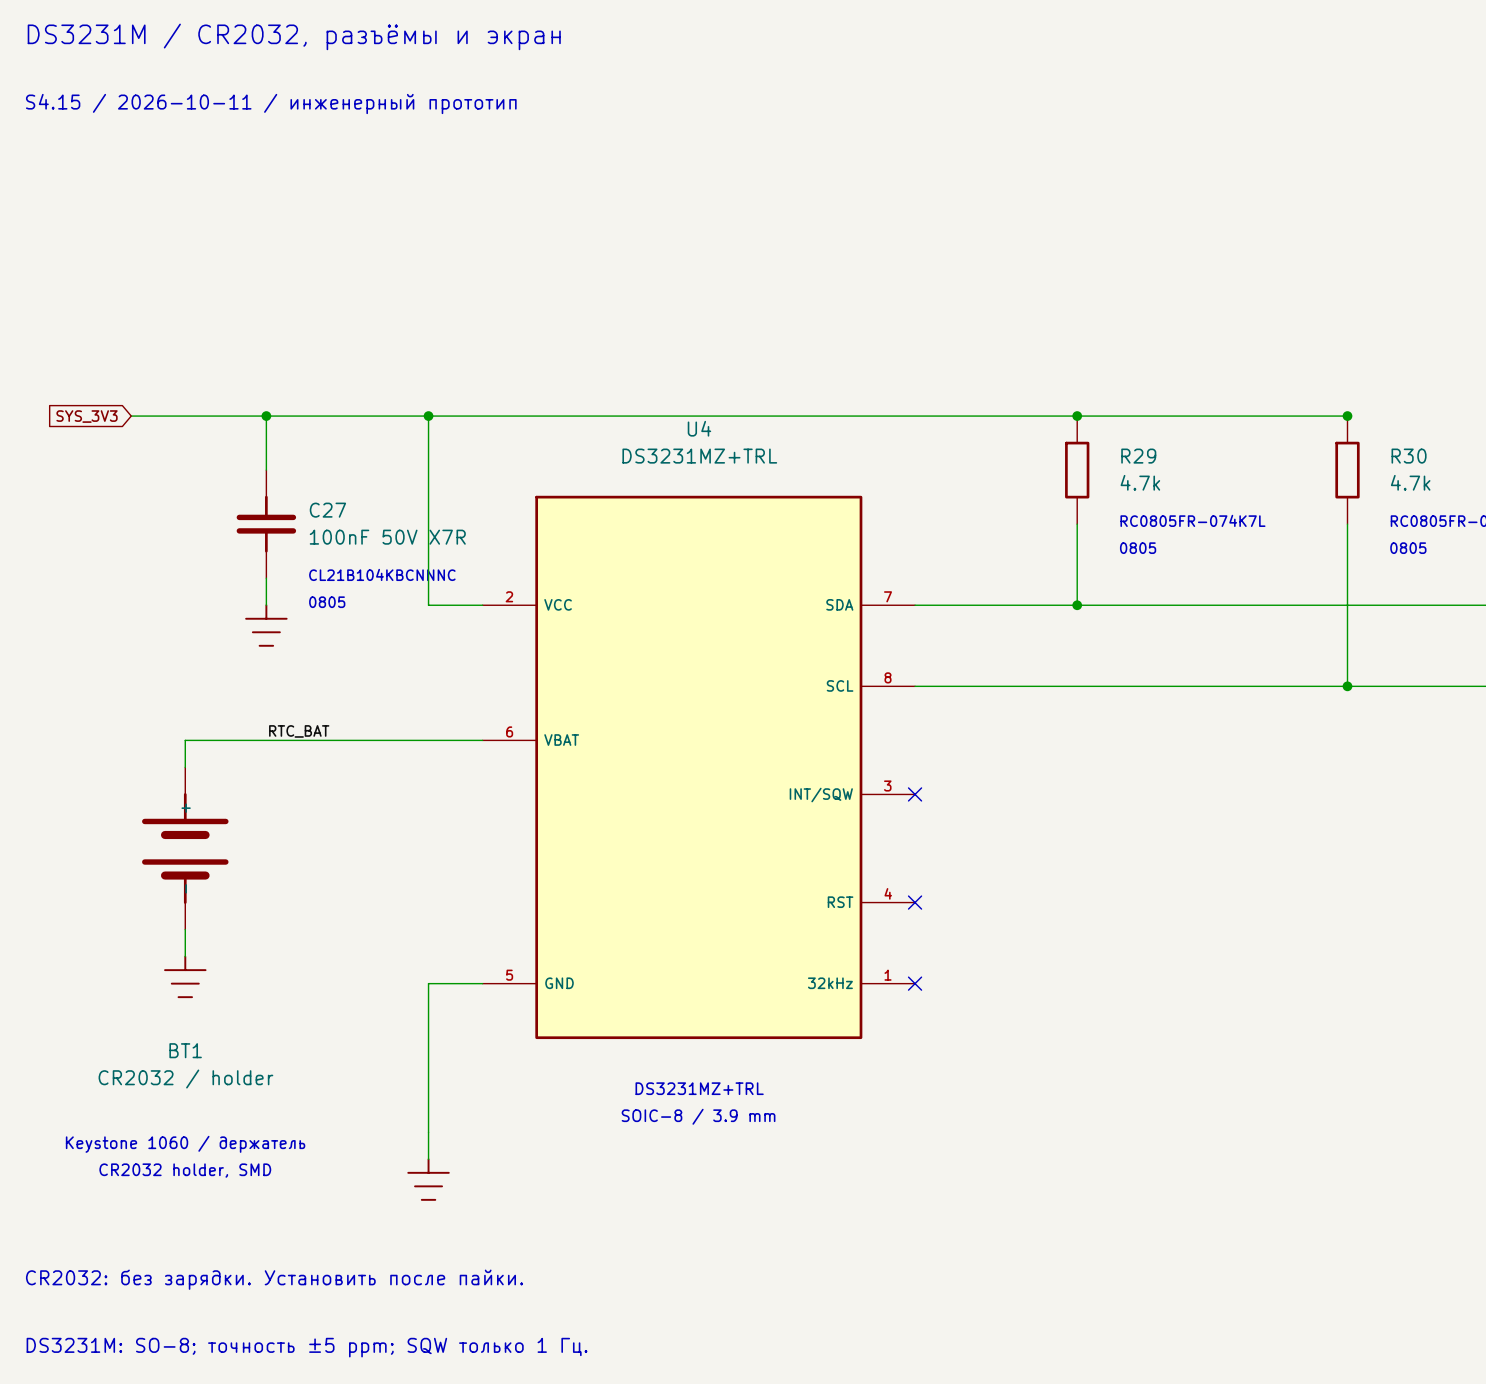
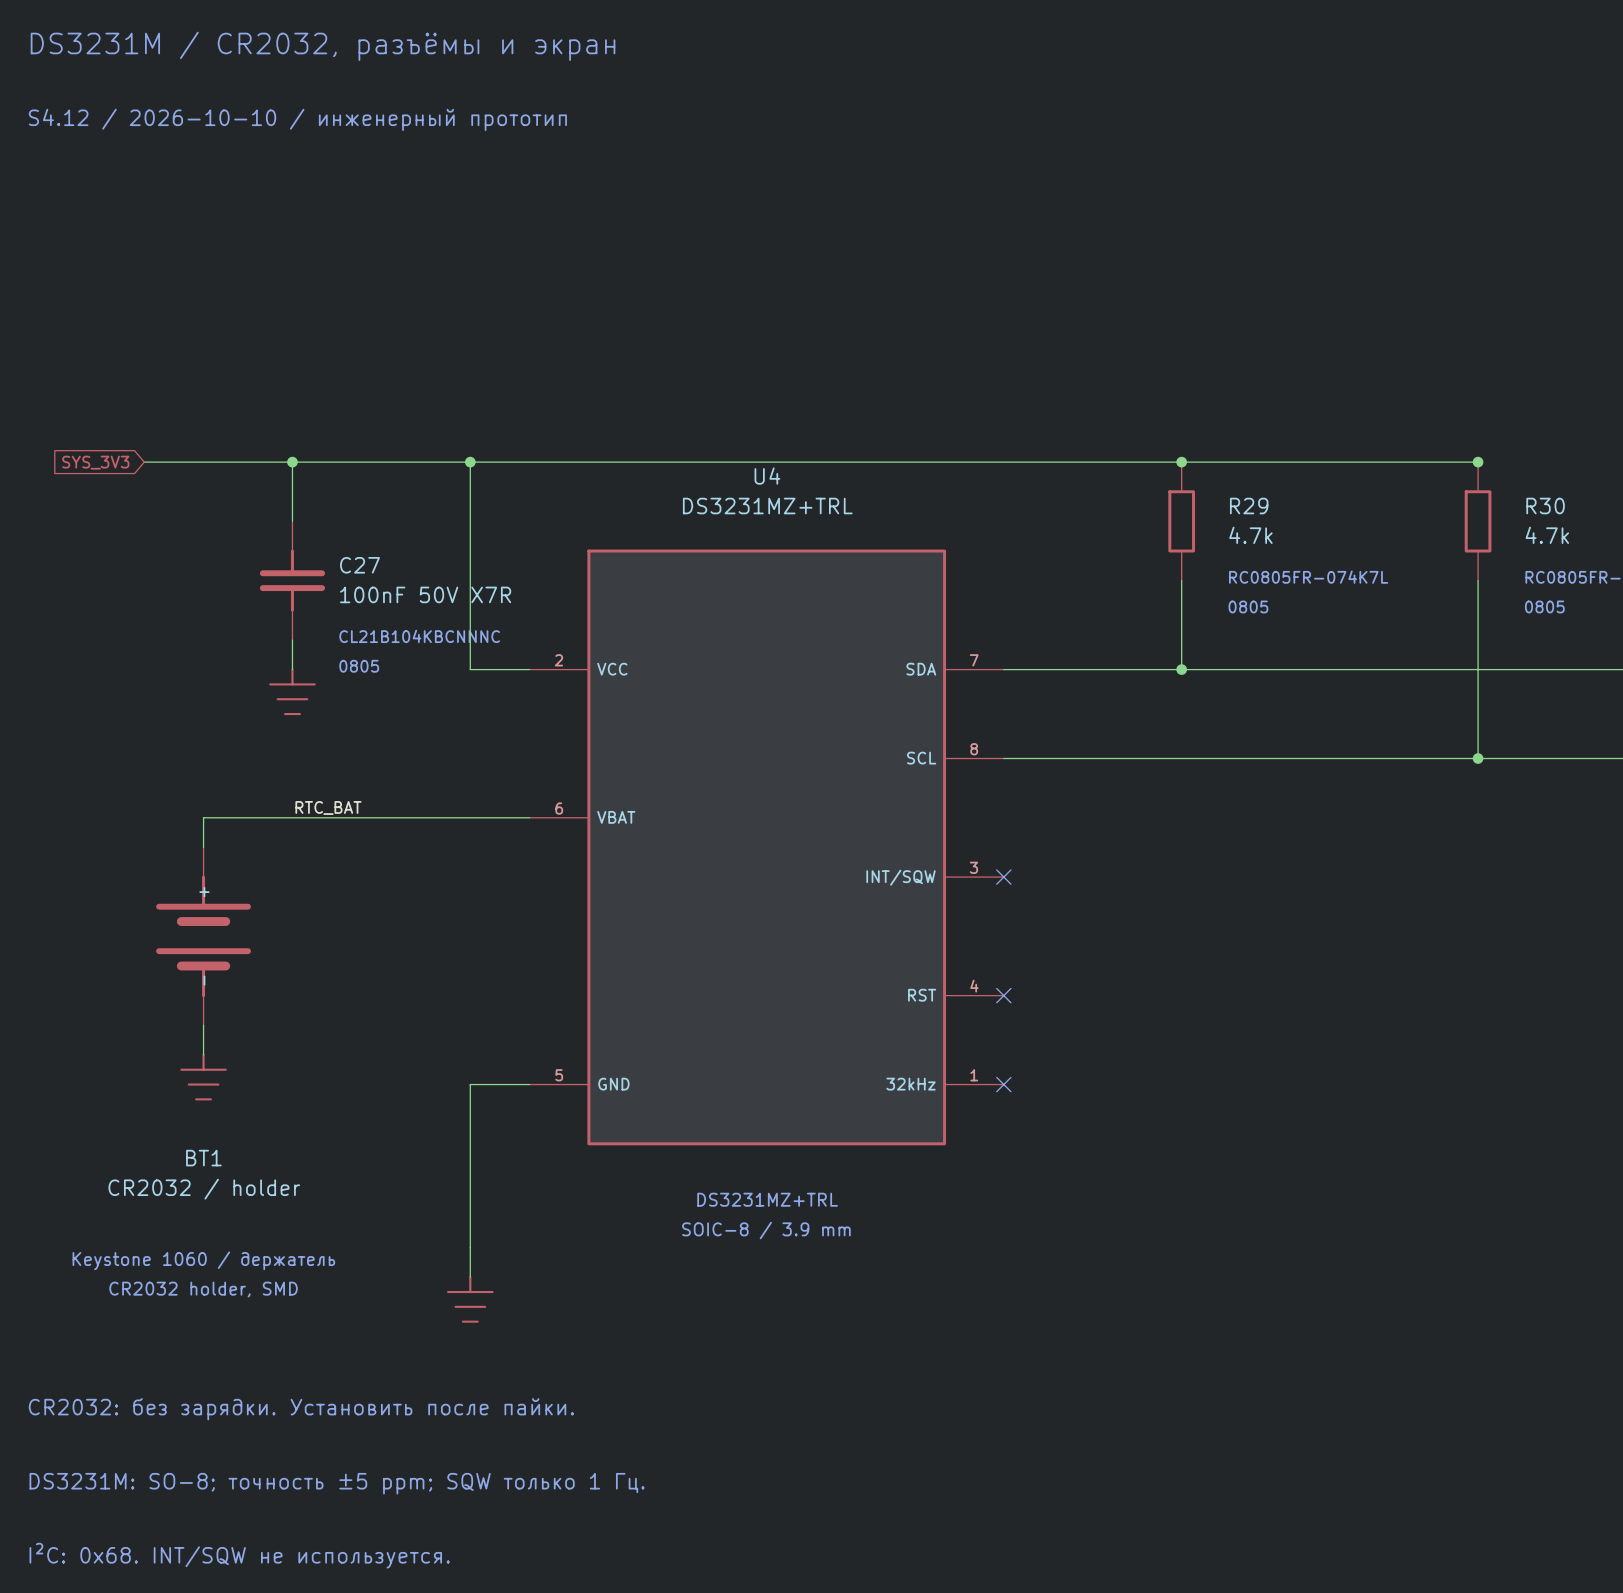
text: S4.15 / 2026-10-11 / инженерный прототип (271, 103) -> S4.12 / 2026-10-10 / инженерный прототип (297, 119)

